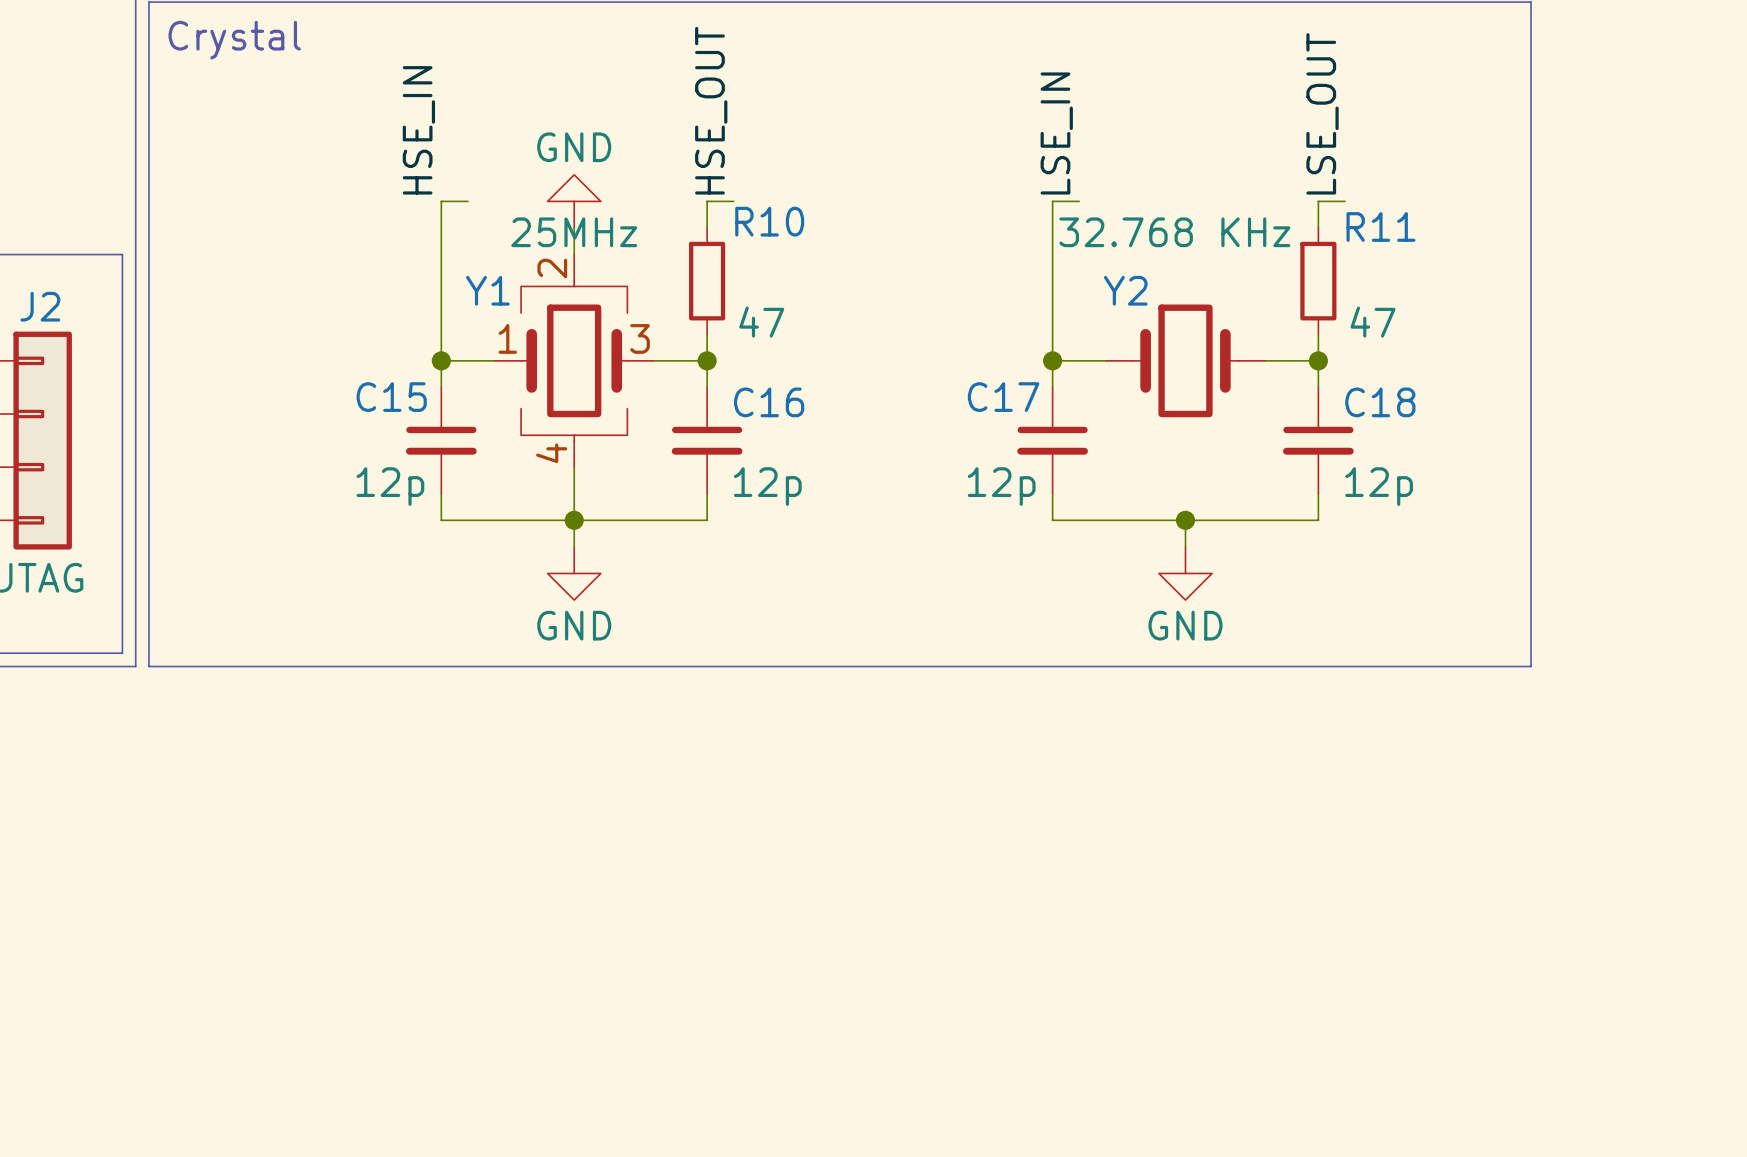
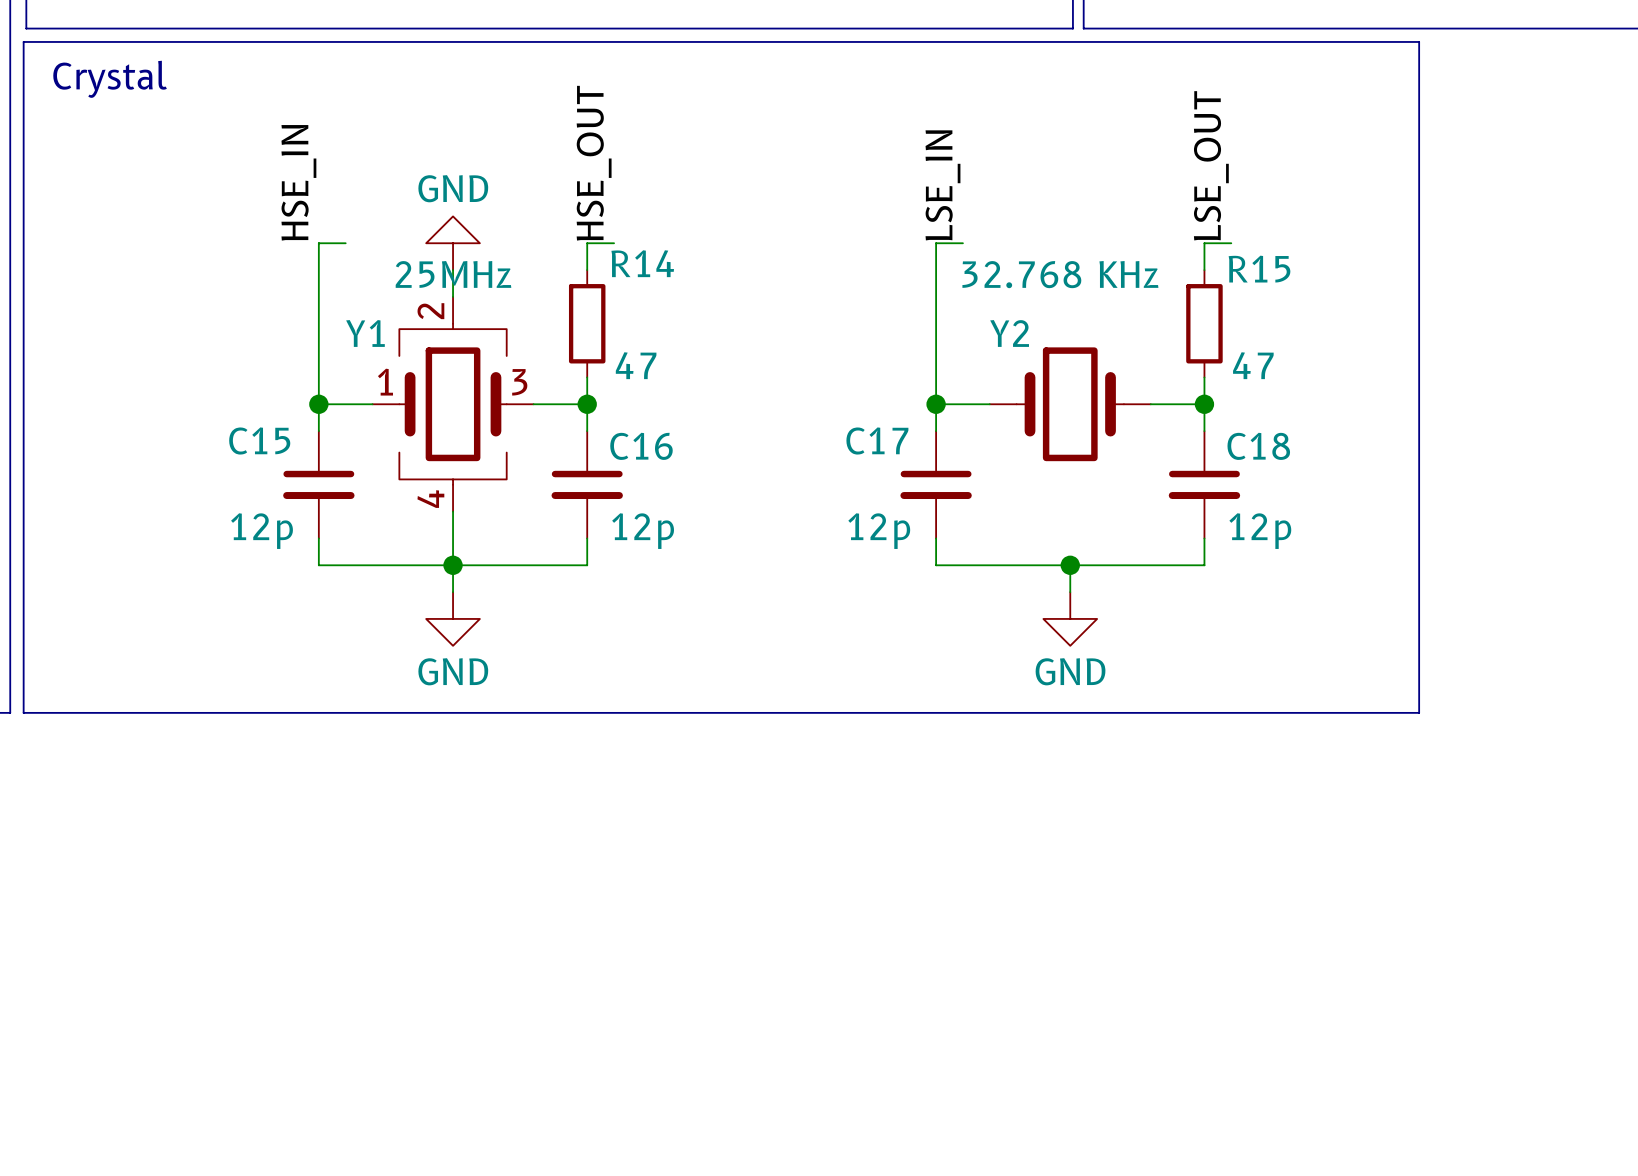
R10 name: R10 (769, 221) -> R14 (642, 263)
R11 name: R11 (1380, 226) -> R15 (1259, 269)

